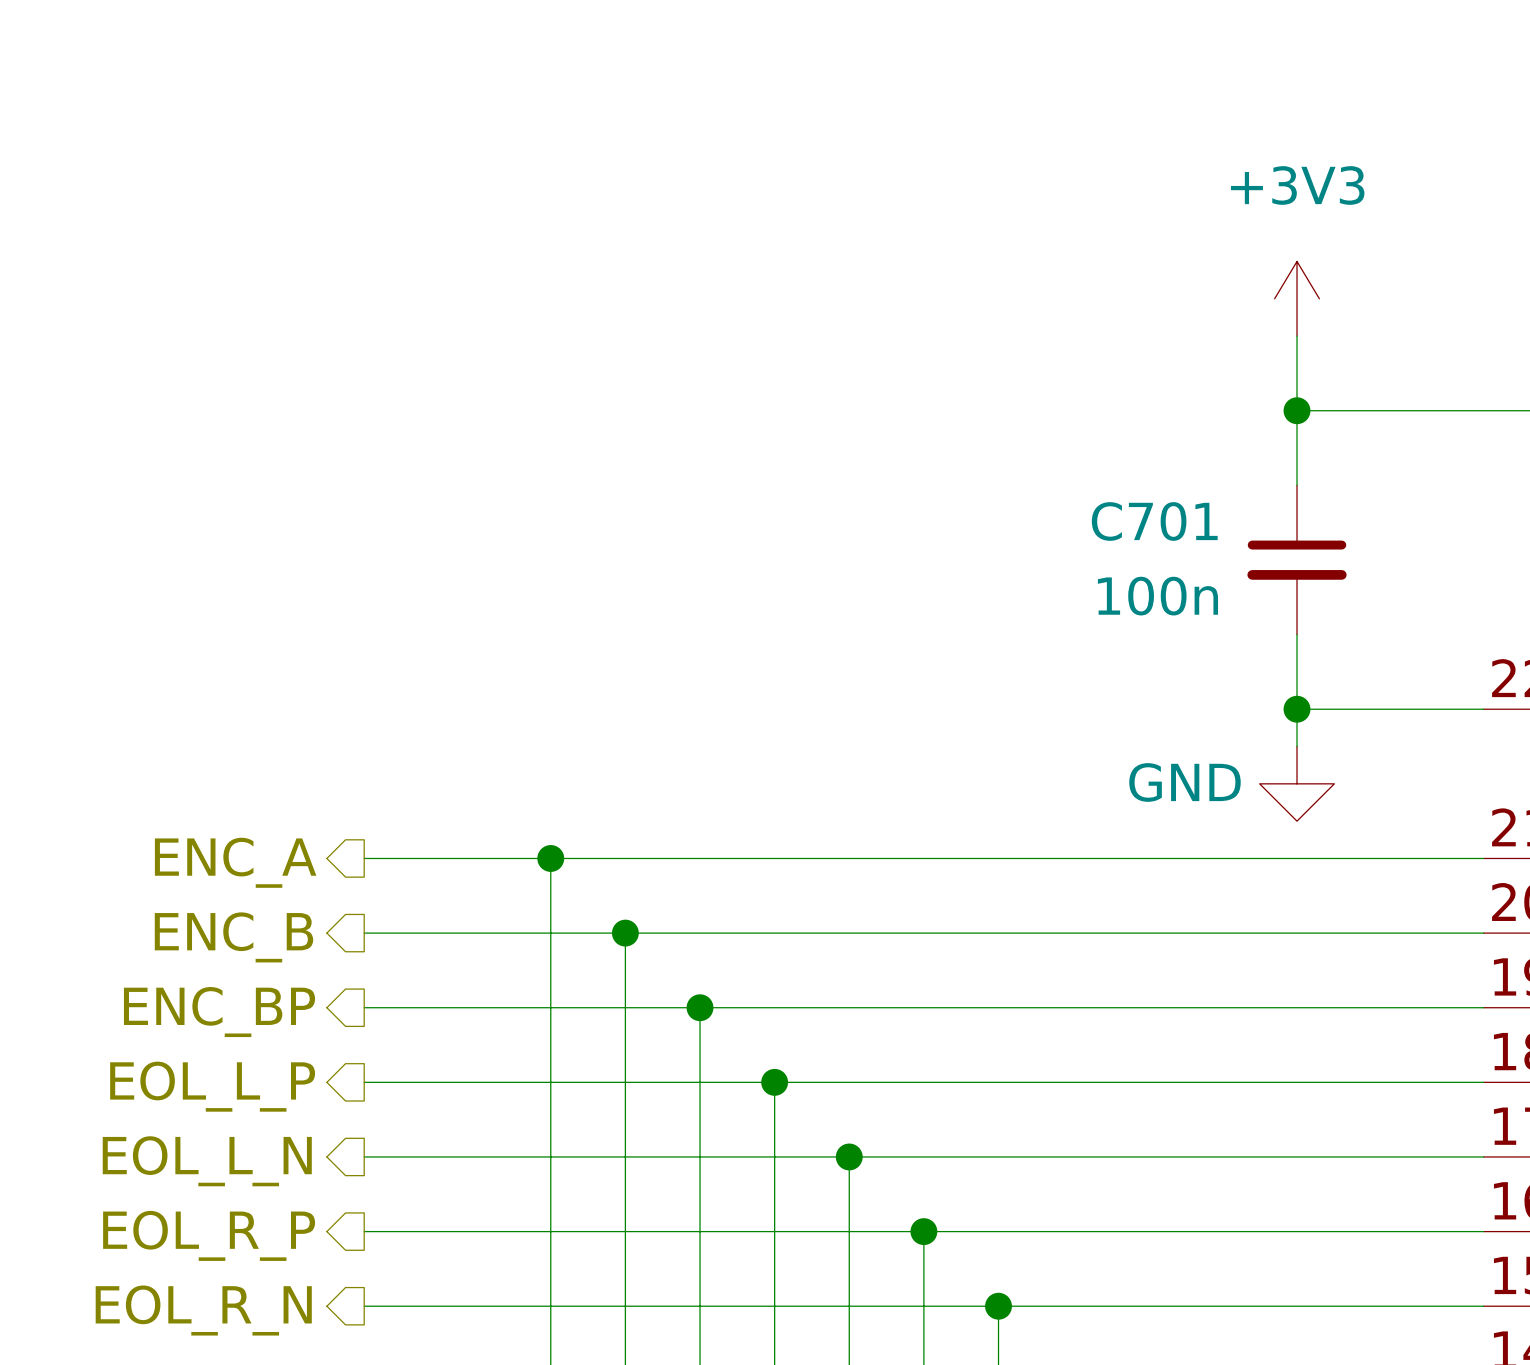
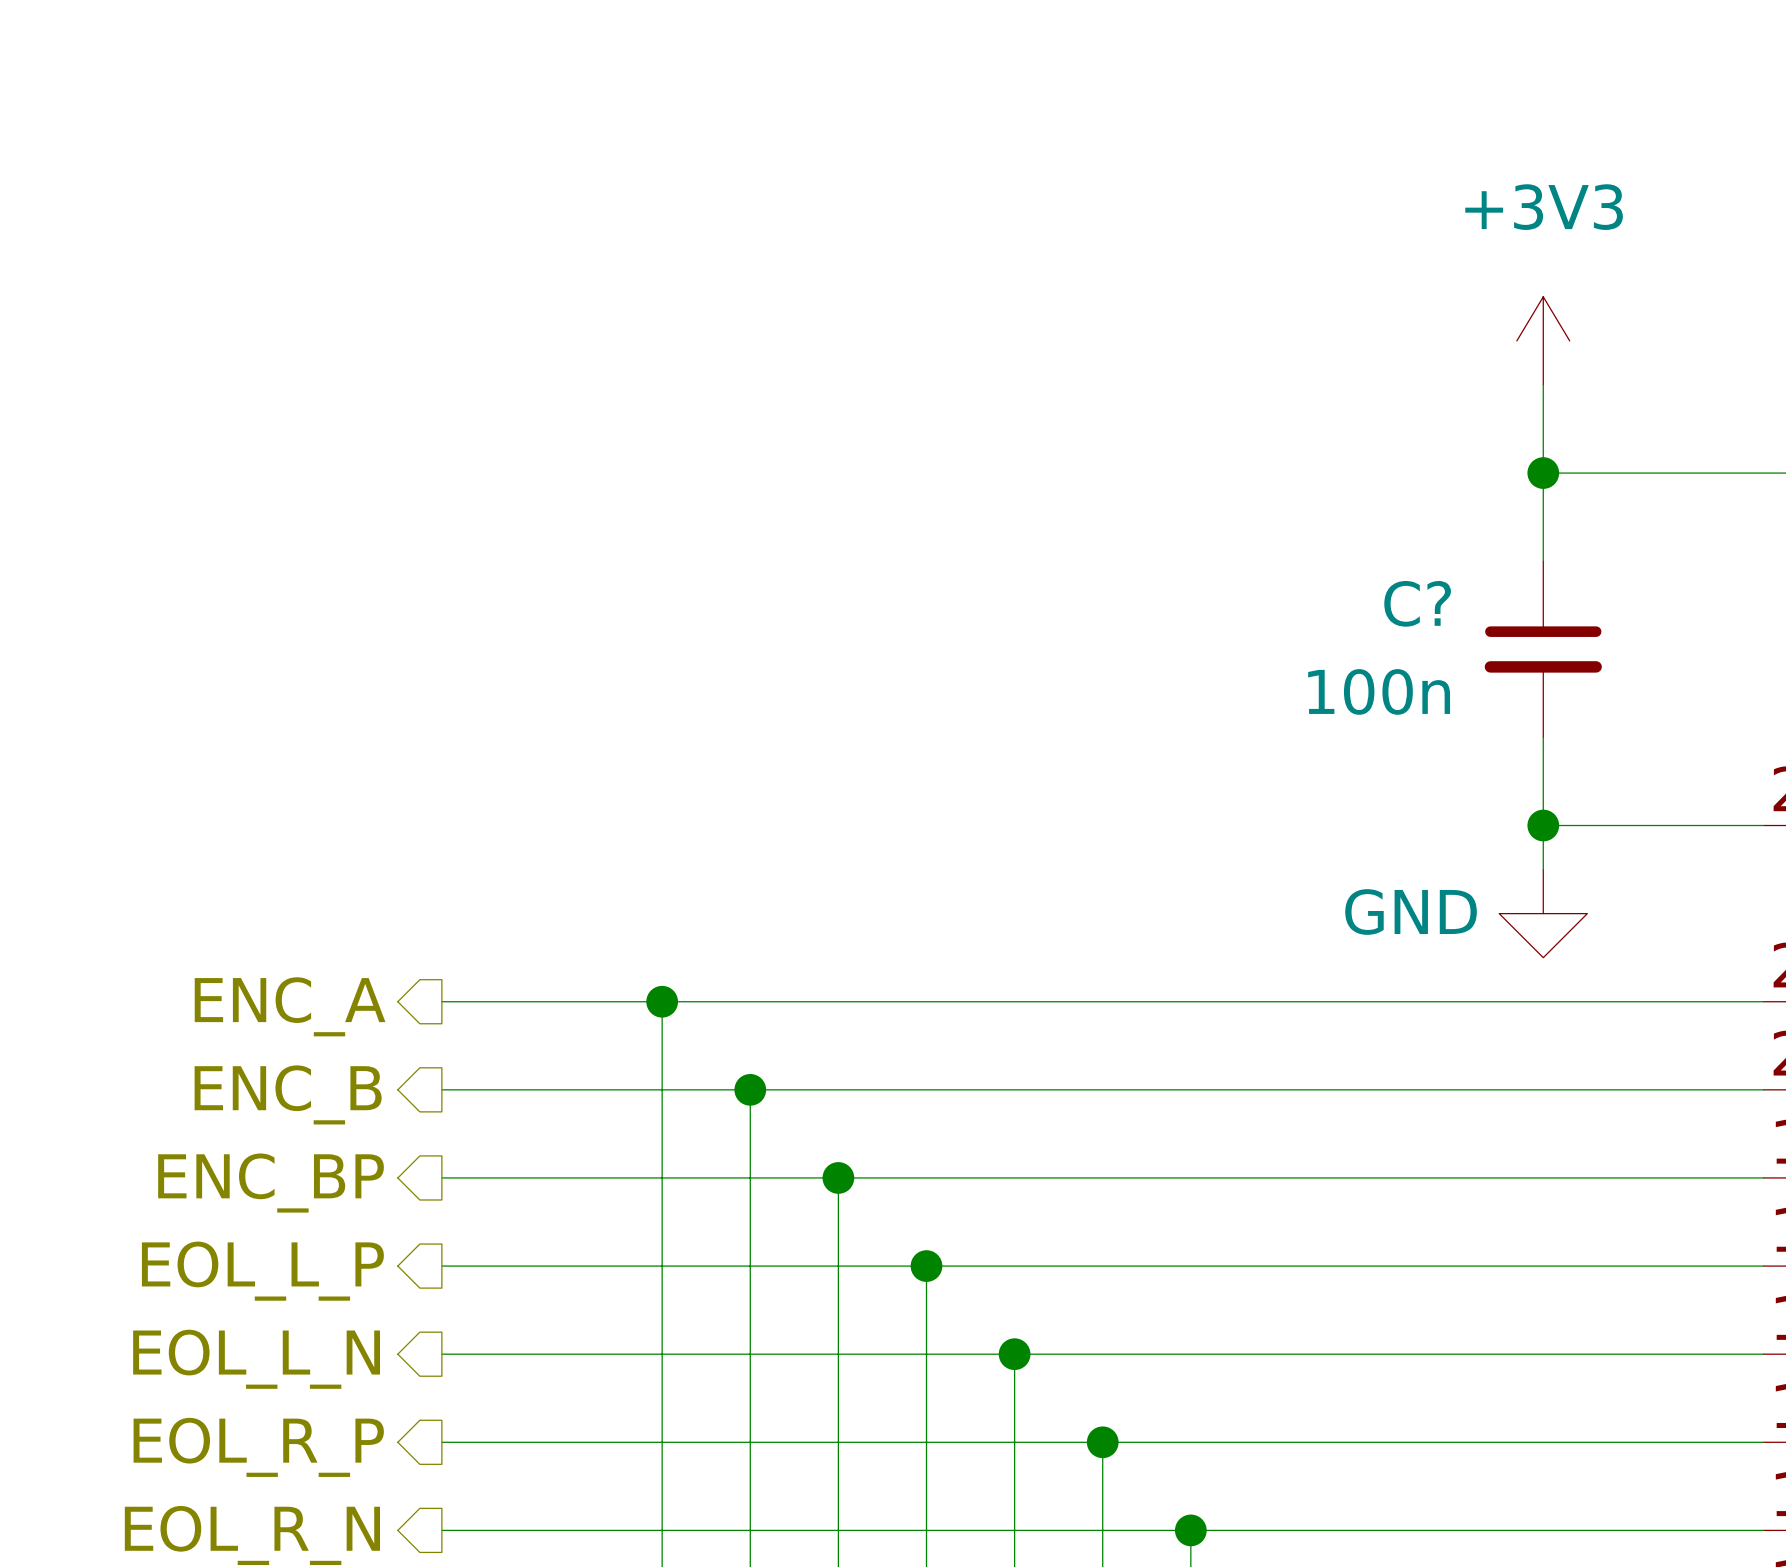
C701 name: C701 (1154, 521) -> C? (1417, 603)

